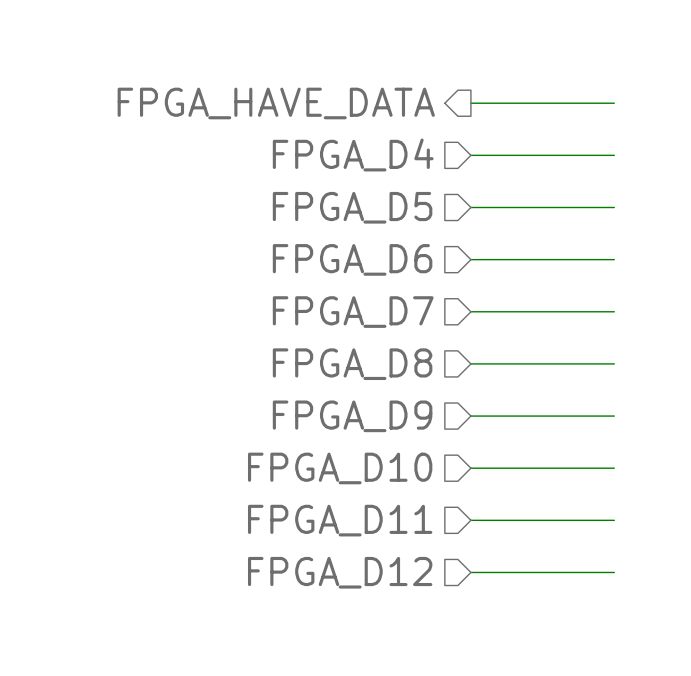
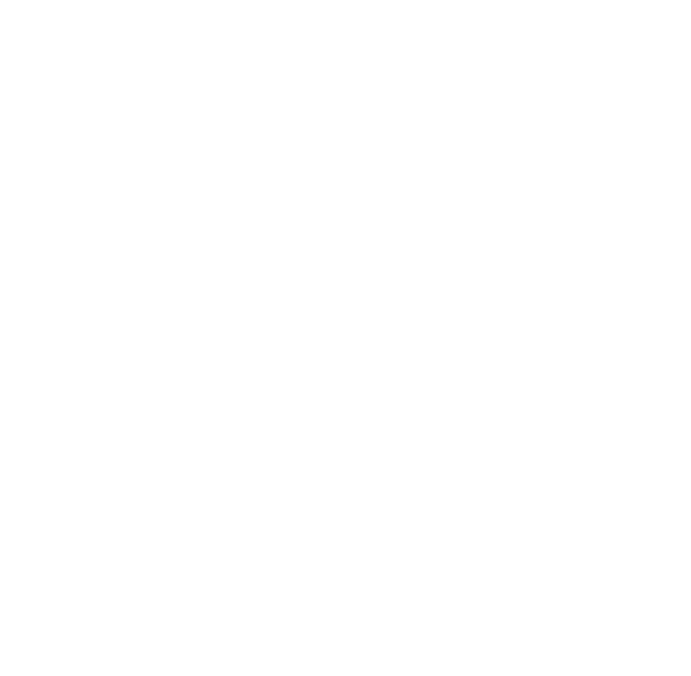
hierarchical label: FPGA_HAVE_DATA (276, 103) -> none
wire: (470, 103) (614, 103) -> none
hierarchical label: FPGA_D4 (353, 155) -> none
wire: (470, 155) (614, 155) -> none
hierarchical label: FPGA_D5 (352, 207) -> none
wire: (470, 207) (614, 207) -> none
hierarchical label: FPGA_D6 (352, 259) -> none
wire: (470, 259) (614, 259) -> none
wire: (470, 311) (614, 311) -> none
hierarchical label: FPGA_D7 (353, 312) -> none
wire: (470, 363) (614, 363) -> none
hierarchical label: FPGA_D8 (352, 364) -> none
hierarchical label: FPGA_D9 (352, 416) -> none
wire: (470, 416) (614, 416) -> none
hierarchical label: FPGA_D10 (340, 468) -> none
wire: (470, 468) (614, 468) -> none
hierarchical label: FPGA_D11 (340, 520) -> none
wire: (470, 520) (614, 520) -> none
hierarchical label: FPGA_D12 (340, 572) -> none
wire: (470, 572) (614, 572) -> none

